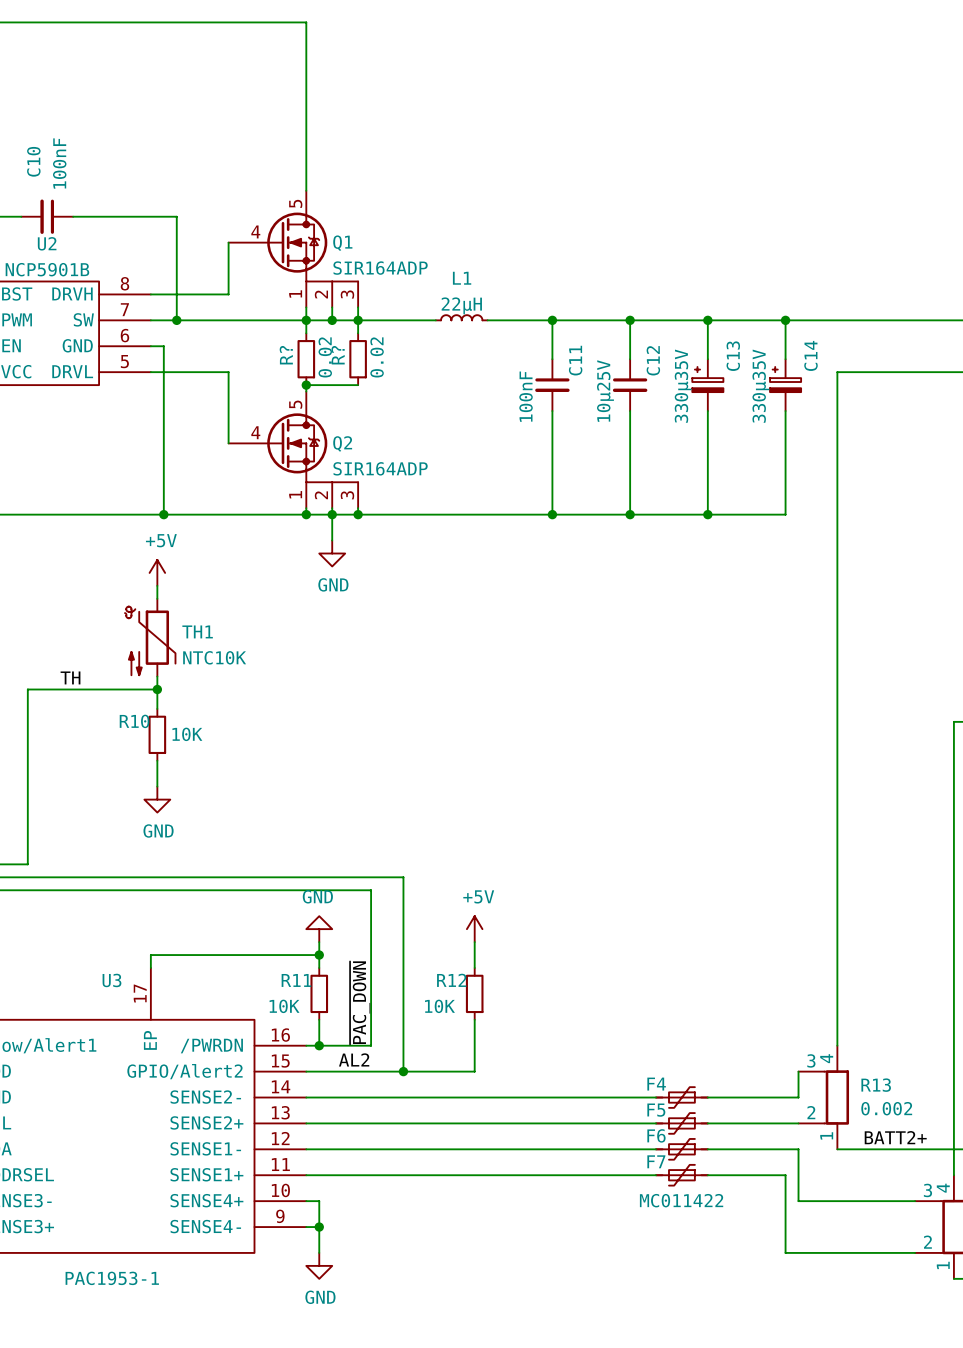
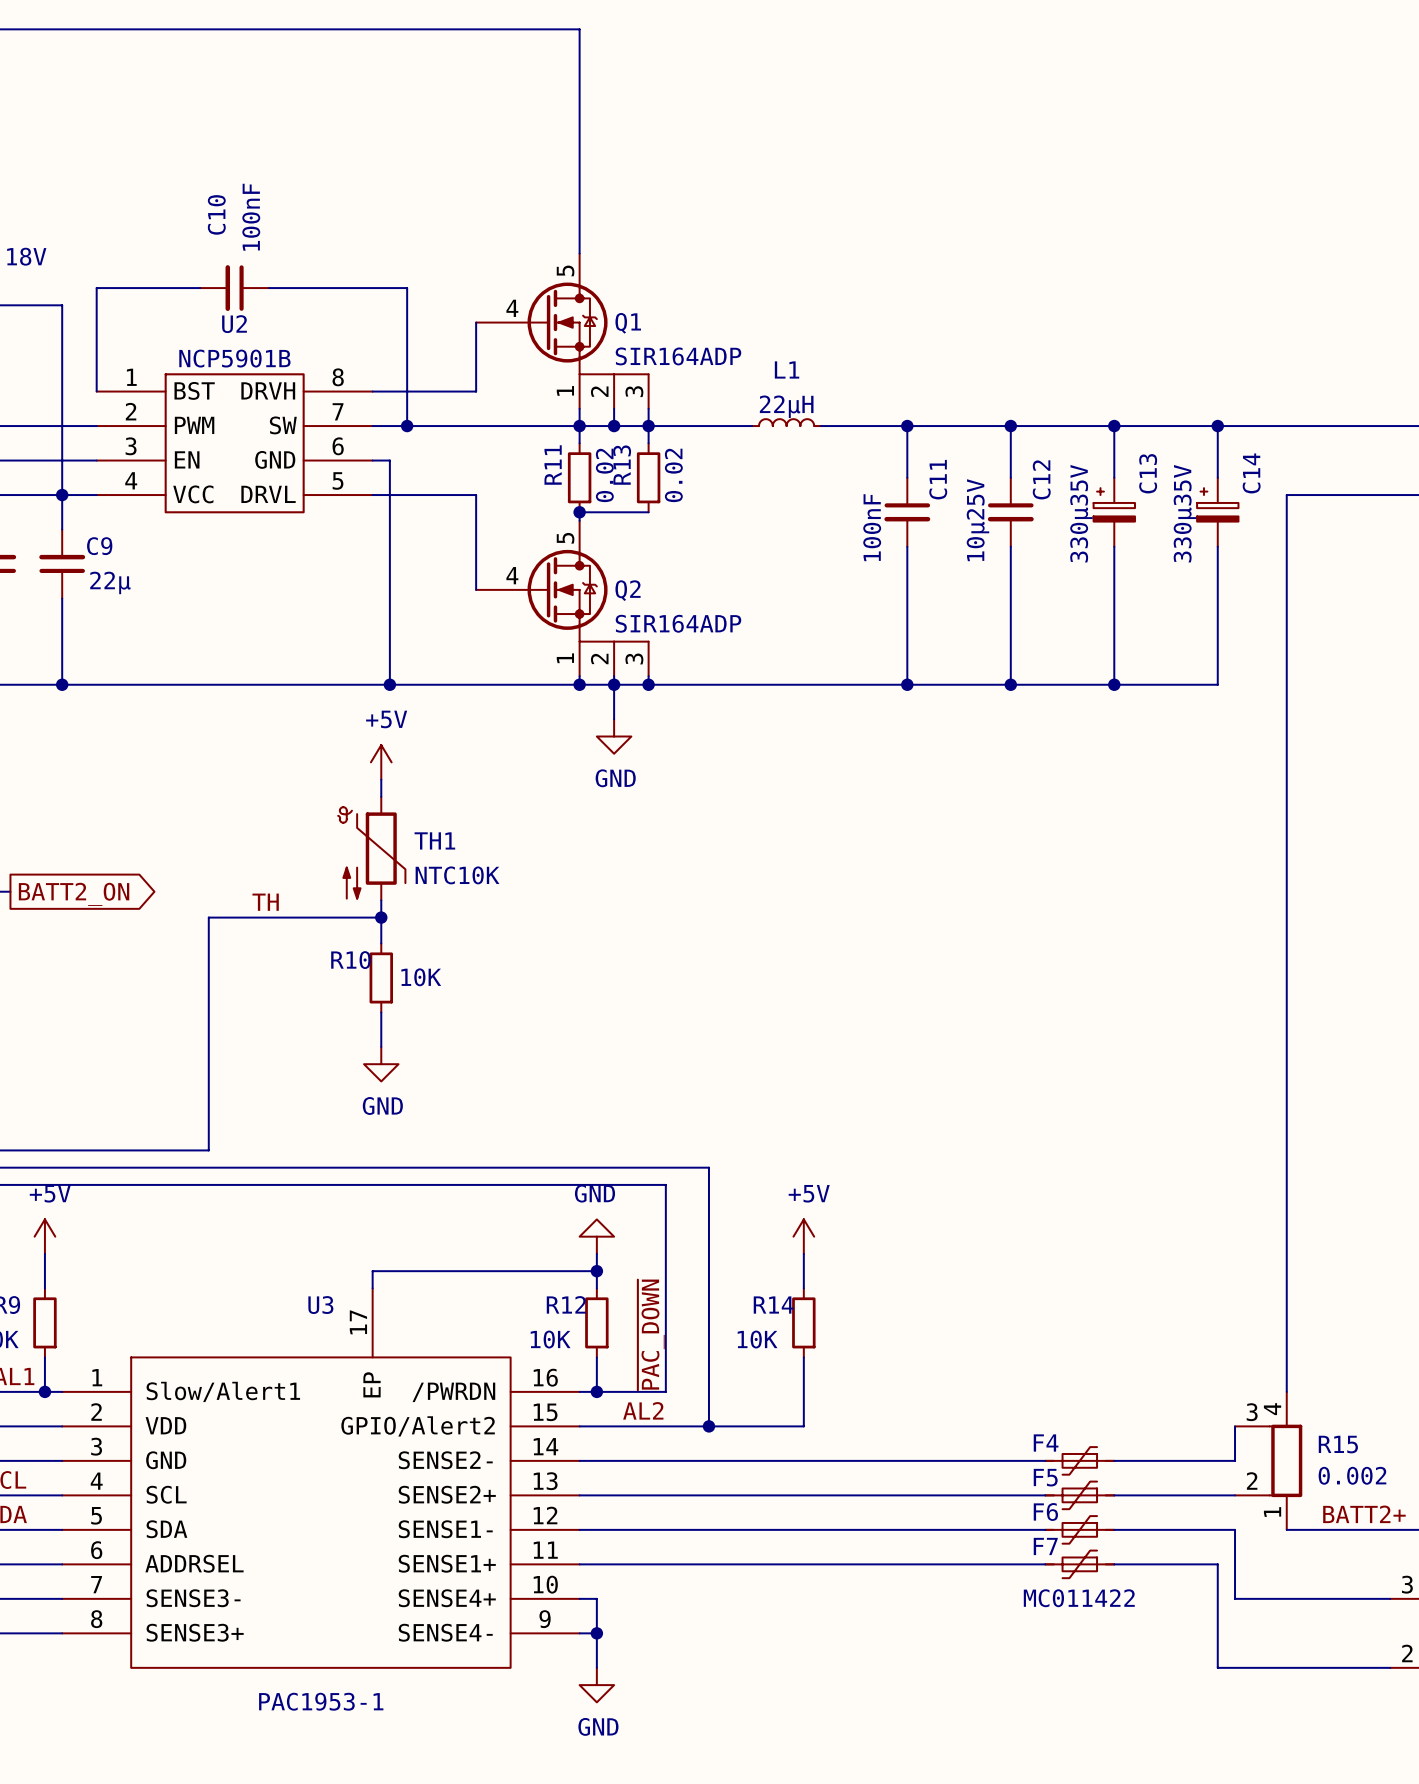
R? name: R? (286, 355) -> R11 (553, 465)
R? name: R? (338, 355) -> R13 (622, 465)
R11 name: R11 (296, 980) -> R12 (566, 1304)
R12 name: R12 (451, 980) -> R14 (773, 1305)
R13 name: R13 (876, 1085) -> R15 (1338, 1444)

